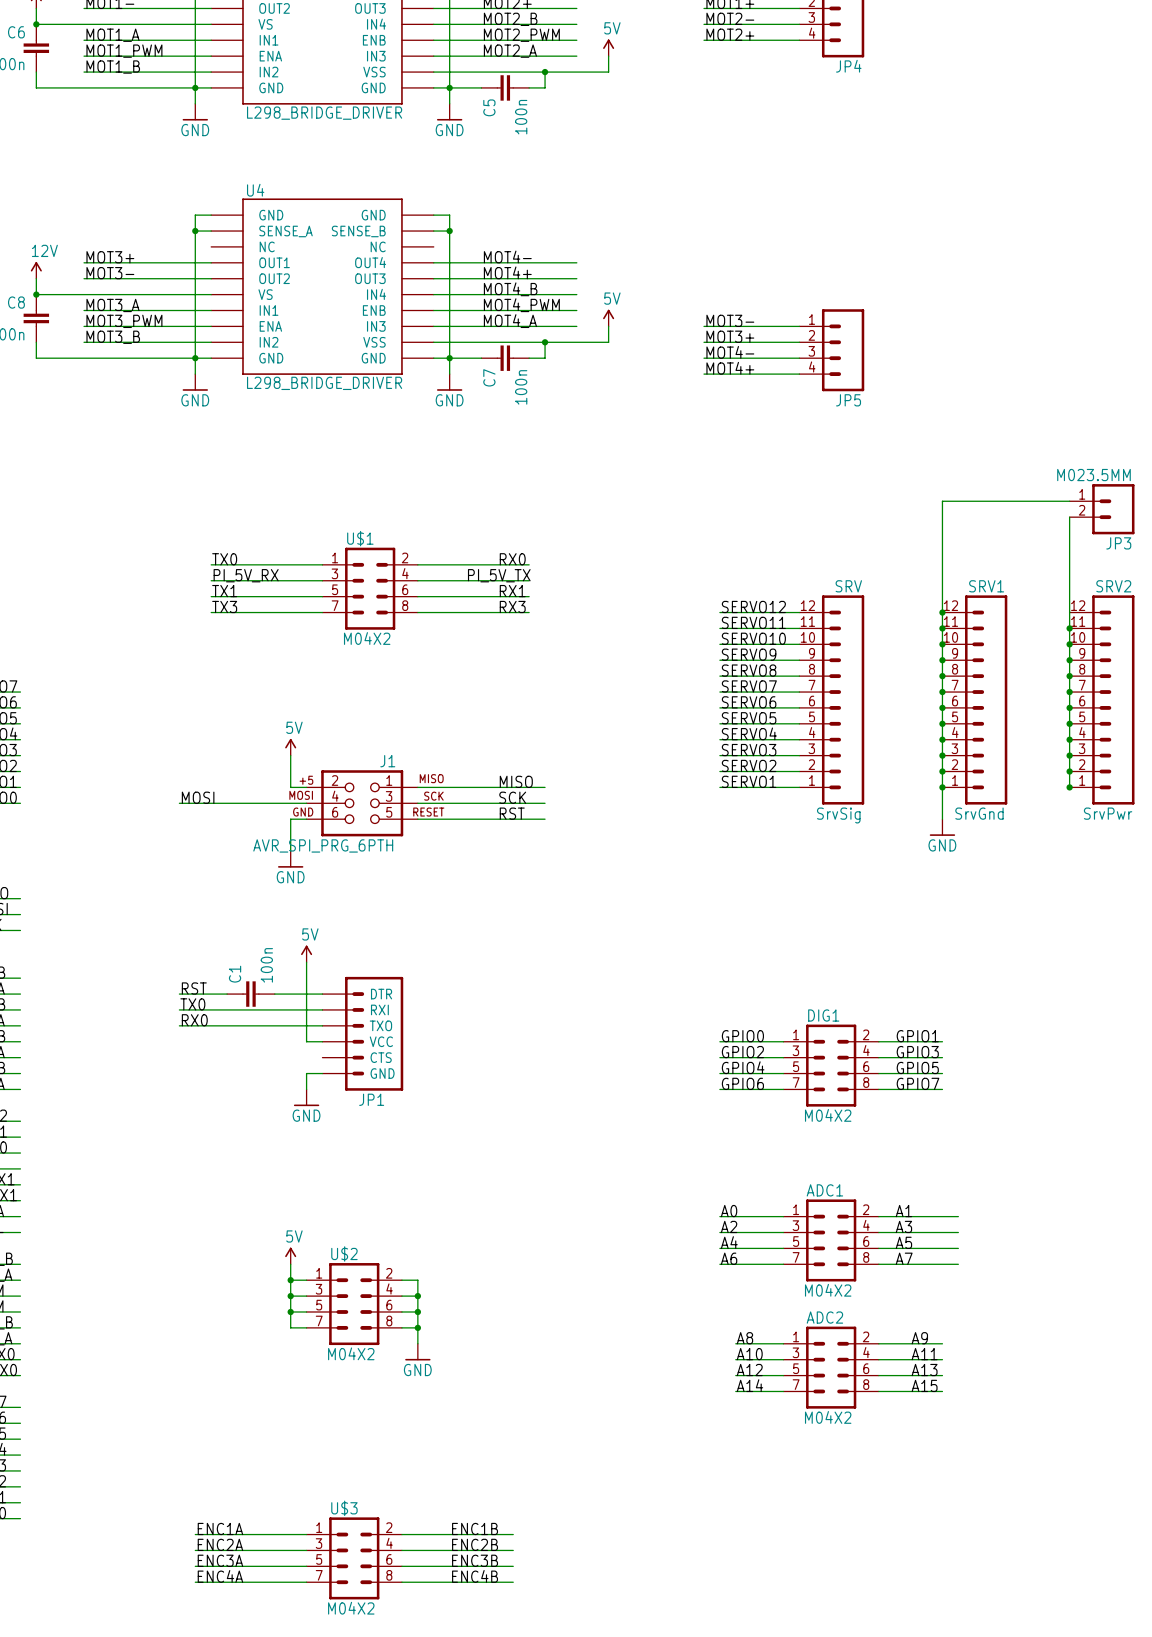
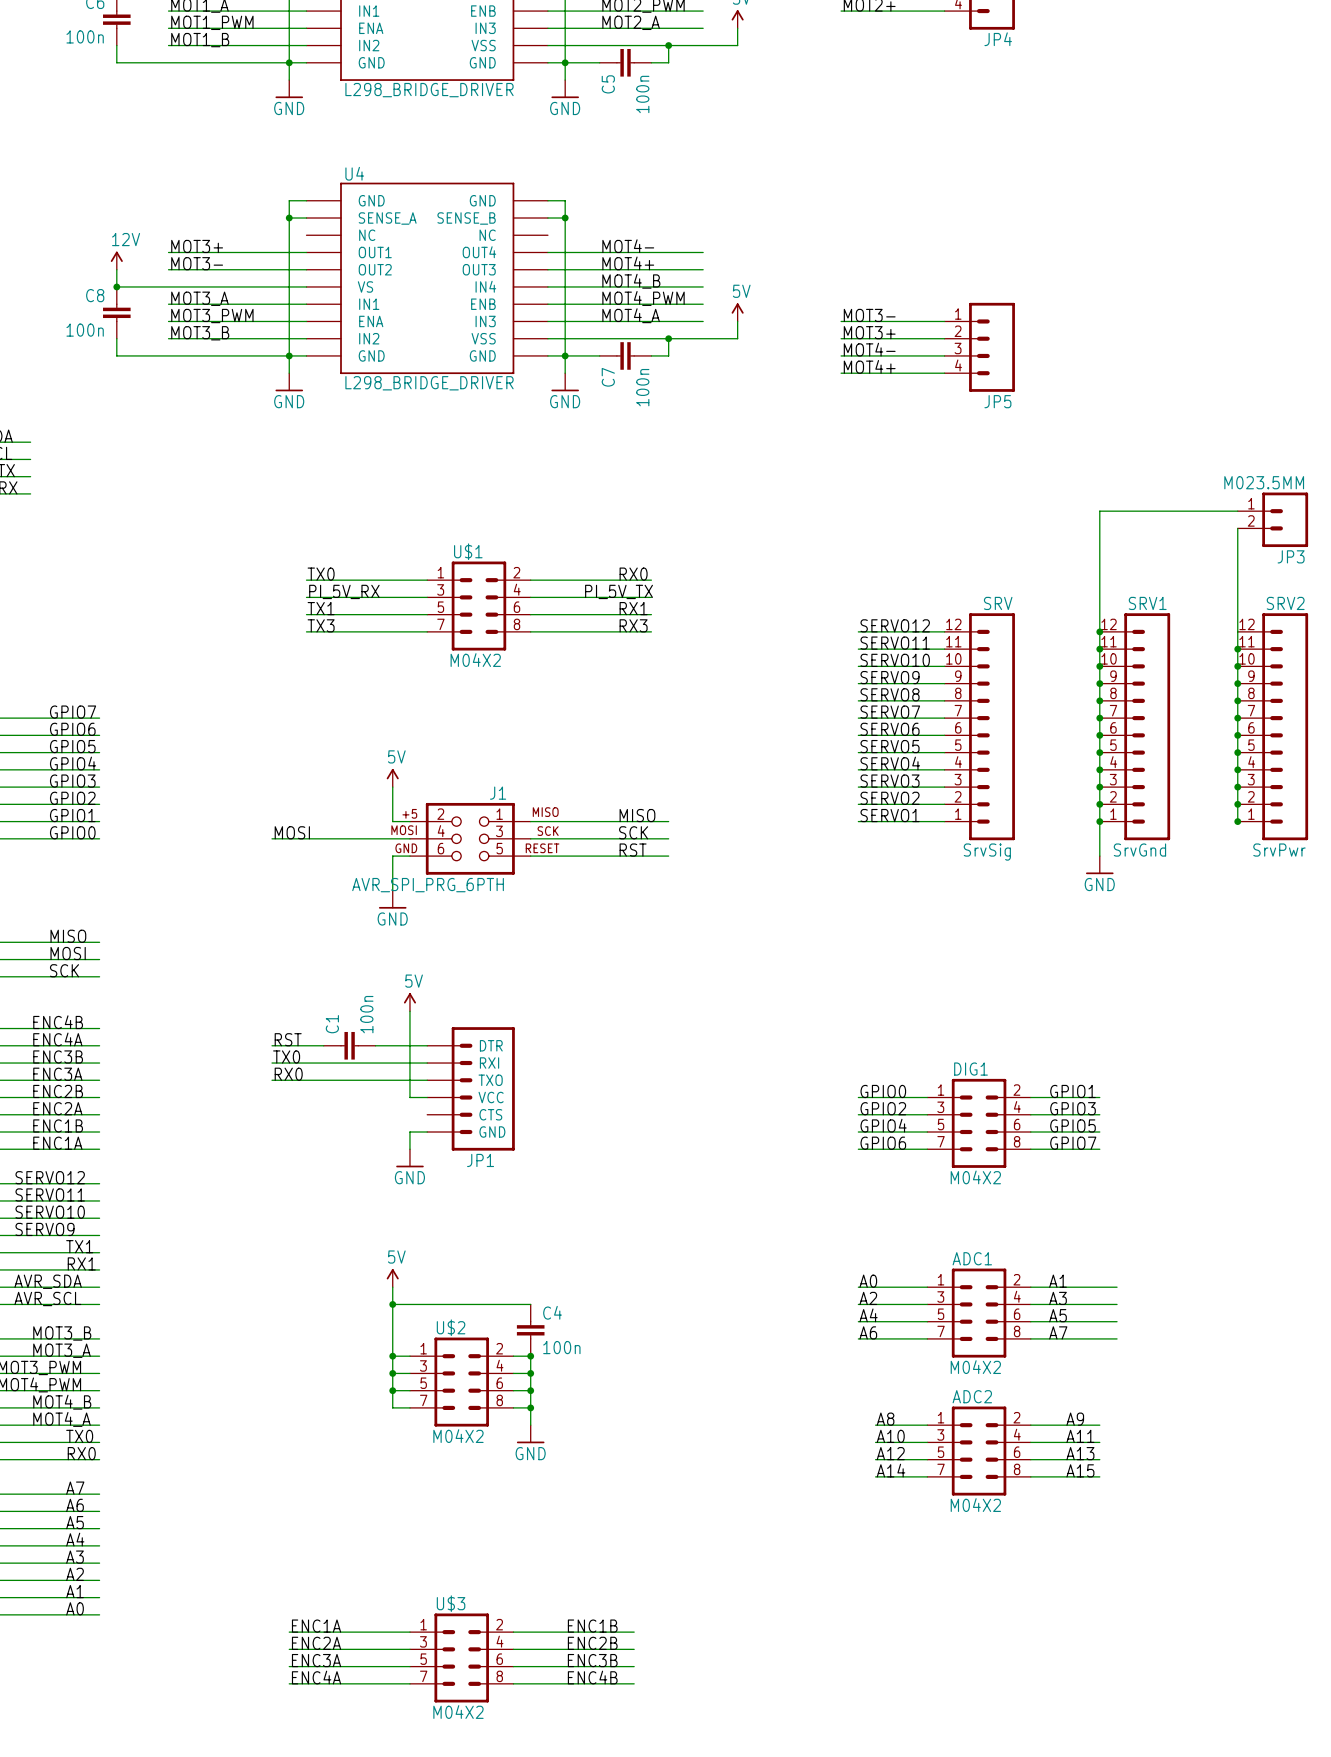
wire: none -> (392, 1287) (392, 1338)
wire: none -> (392, 1304) (530, 1304)
junction: none -> (392, 1304)
power symbol position: 5V (290, 1255) -> 5V (392, 1278)
C4: none -> 100n (530, 1330)
junction: none -> (530, 1356)

